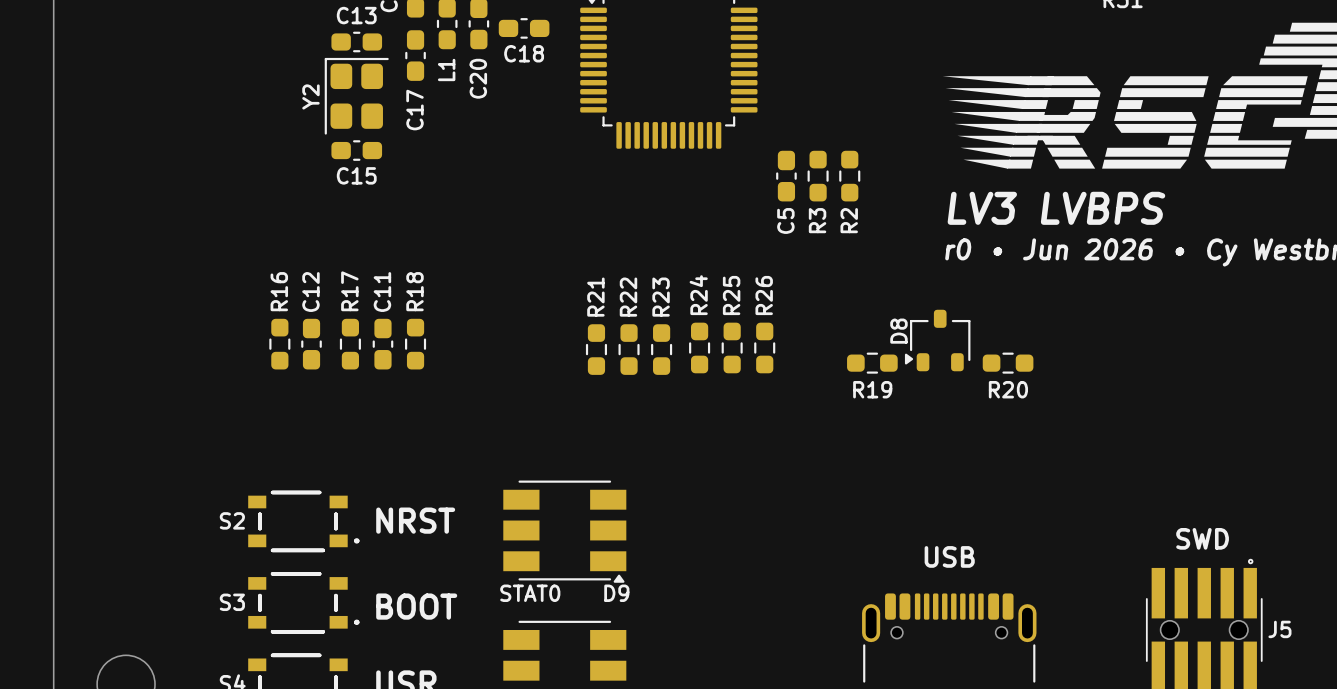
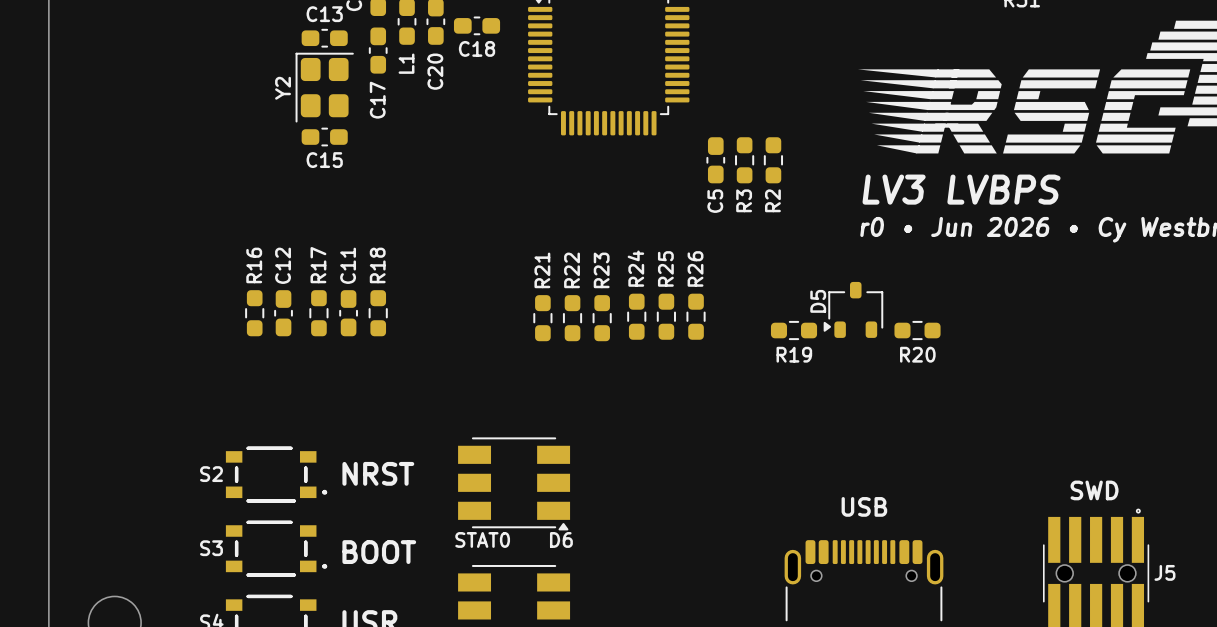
D8 name: D8 (898, 331) -> D5 (818, 301)
D9 name: D9 (616, 593) -> D6 (561, 539)

